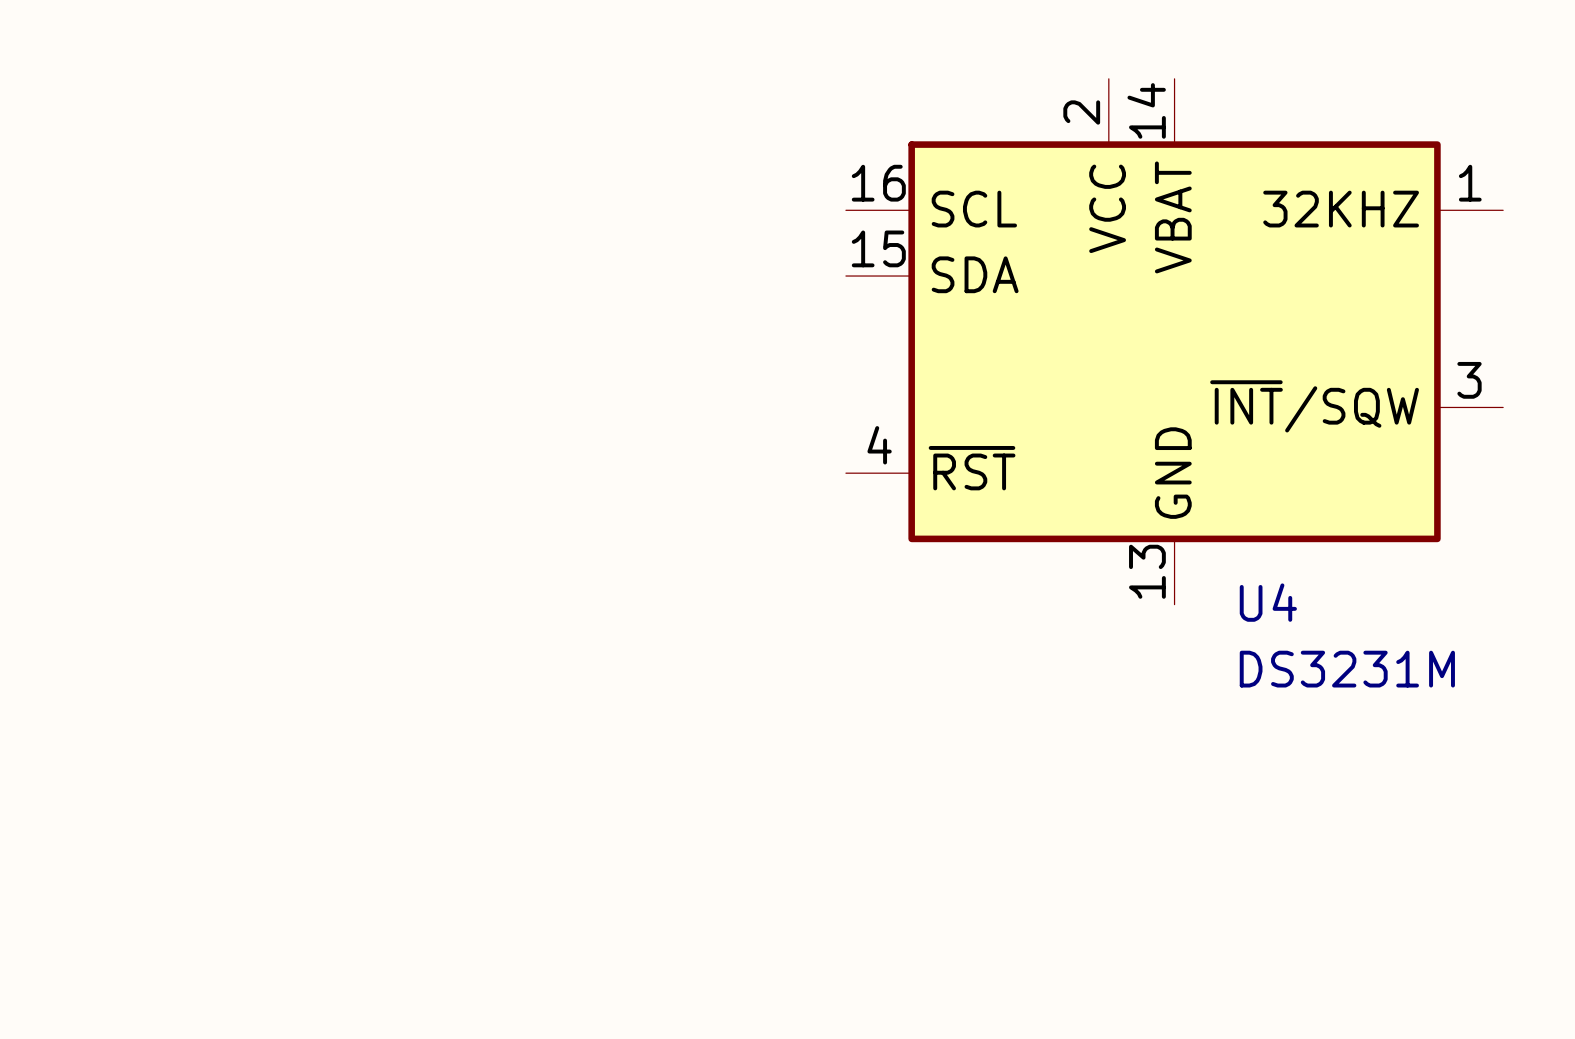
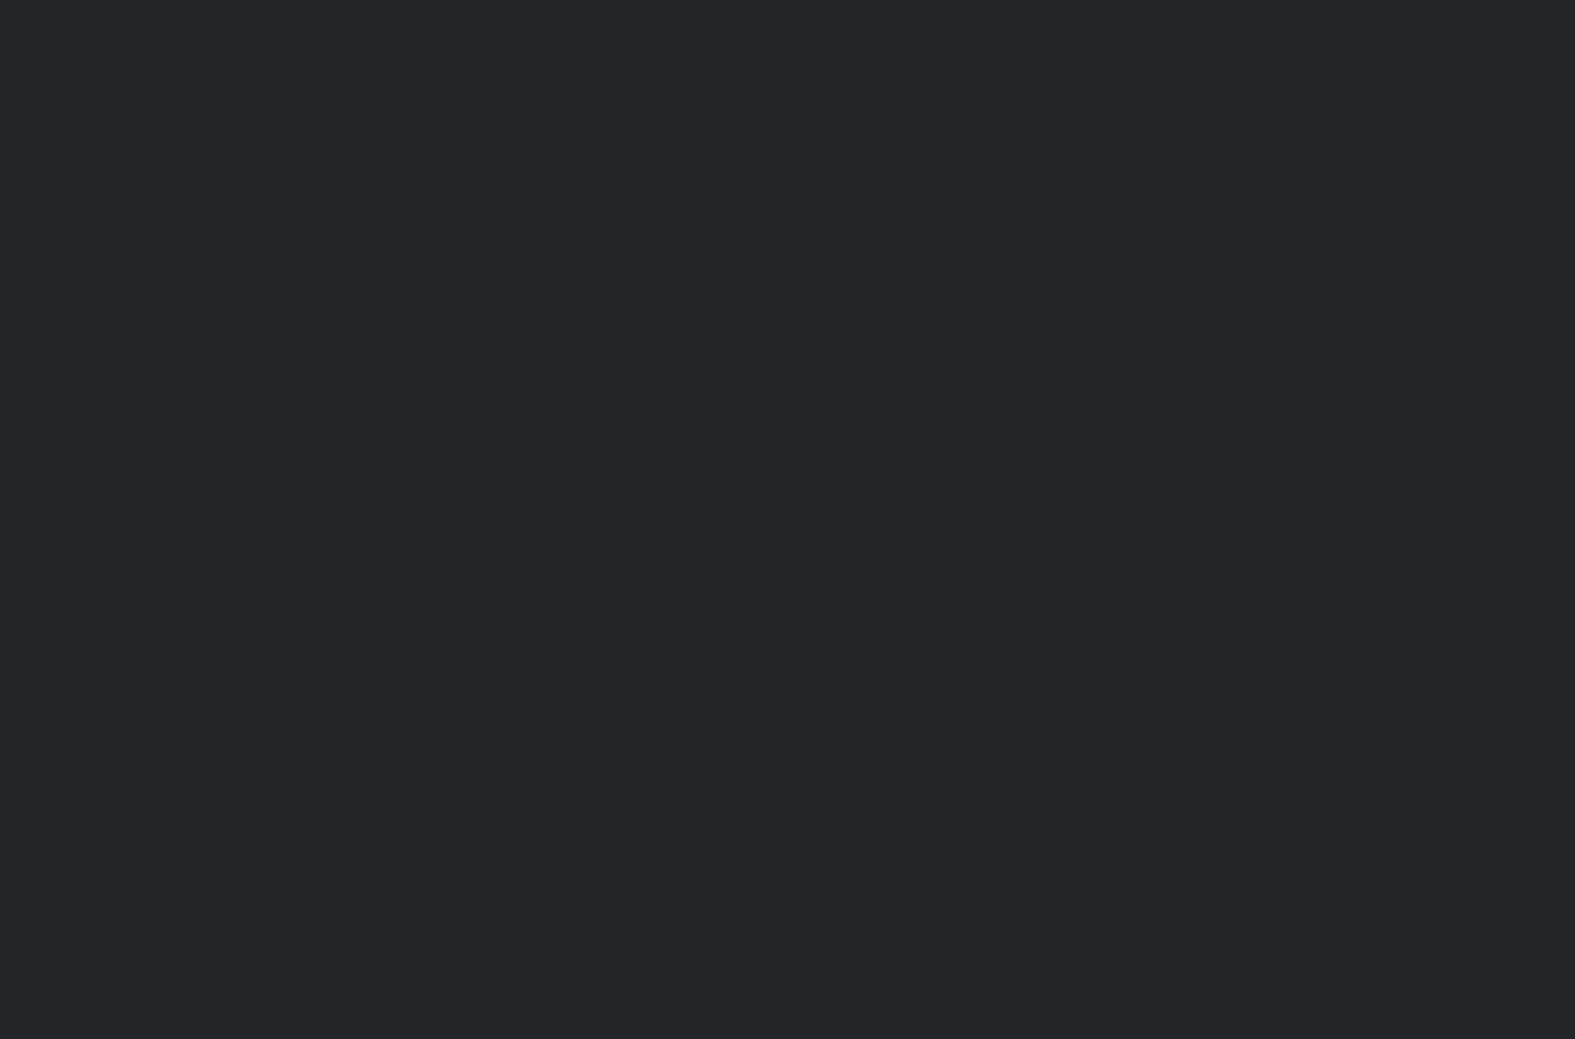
U4: DS3231M (1174, 341) -> none

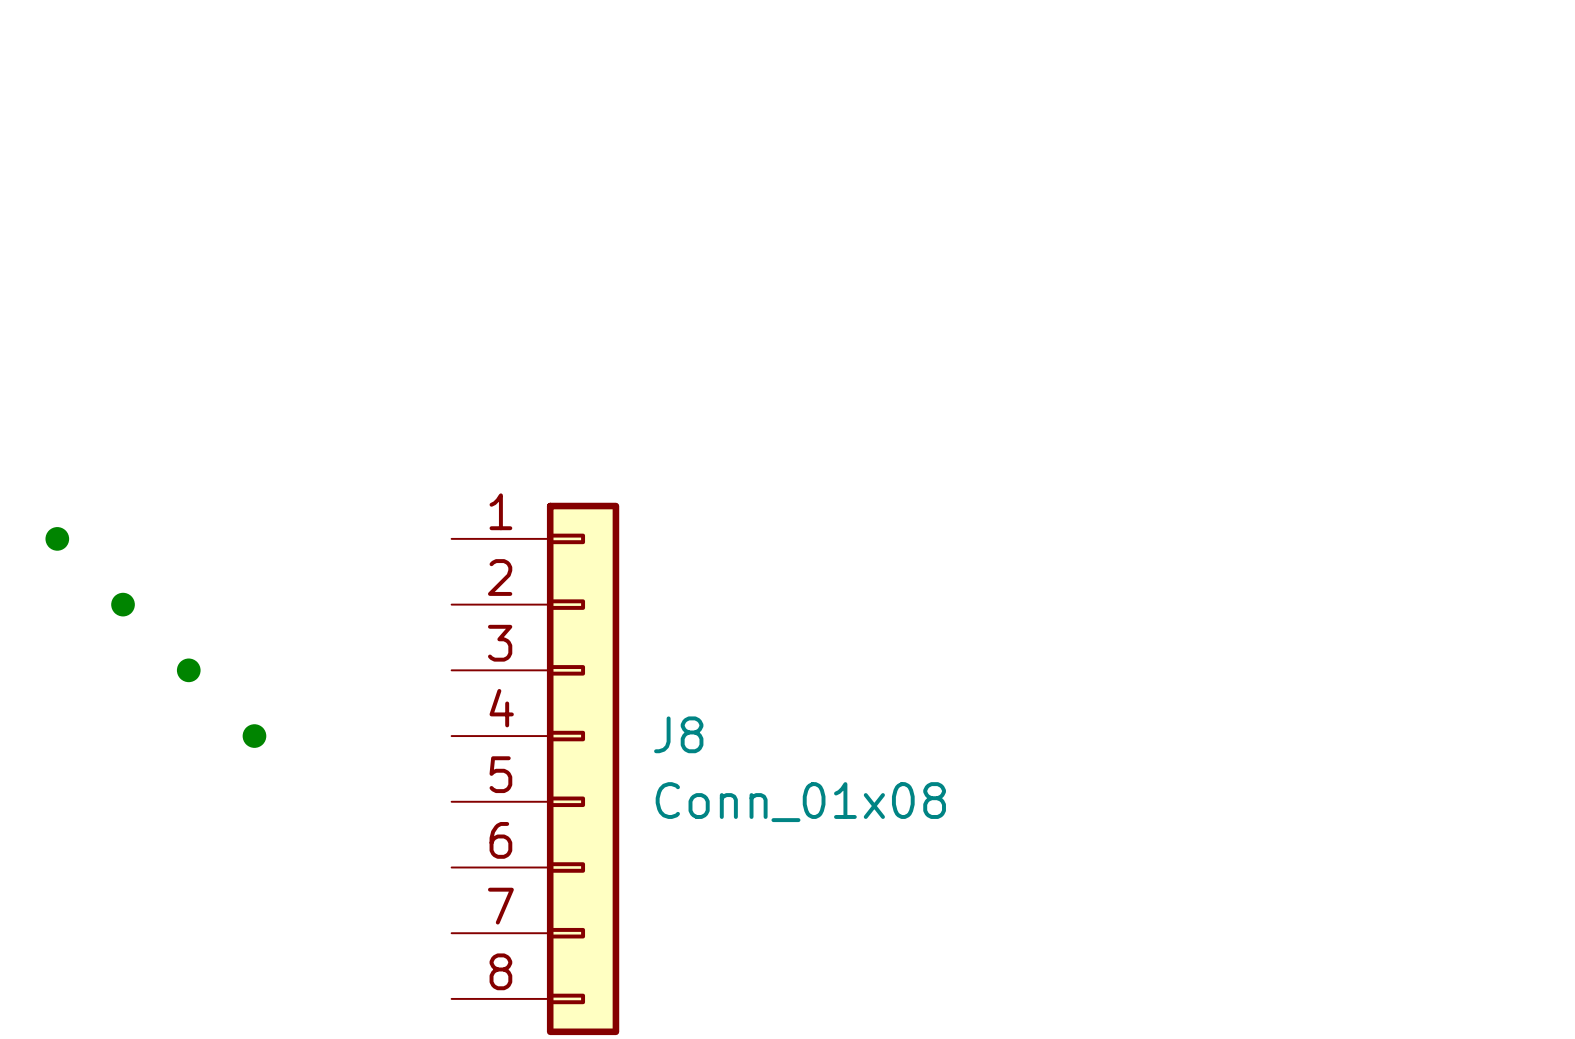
junction: none -> (57, 538)
junction: none -> (123, 604)
junction: none -> (188, 670)
junction: none -> (254, 736)
J8: none -> Conn_01x08 (535, 768)

